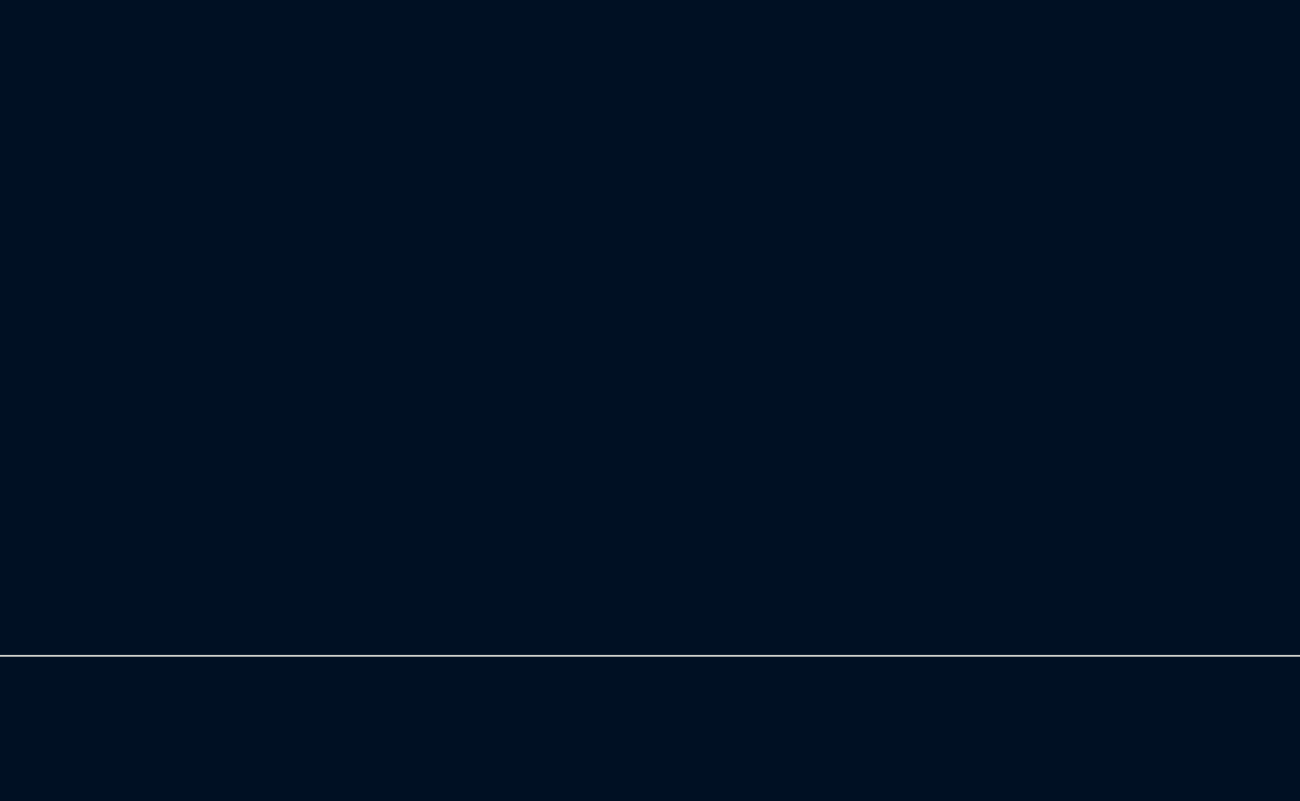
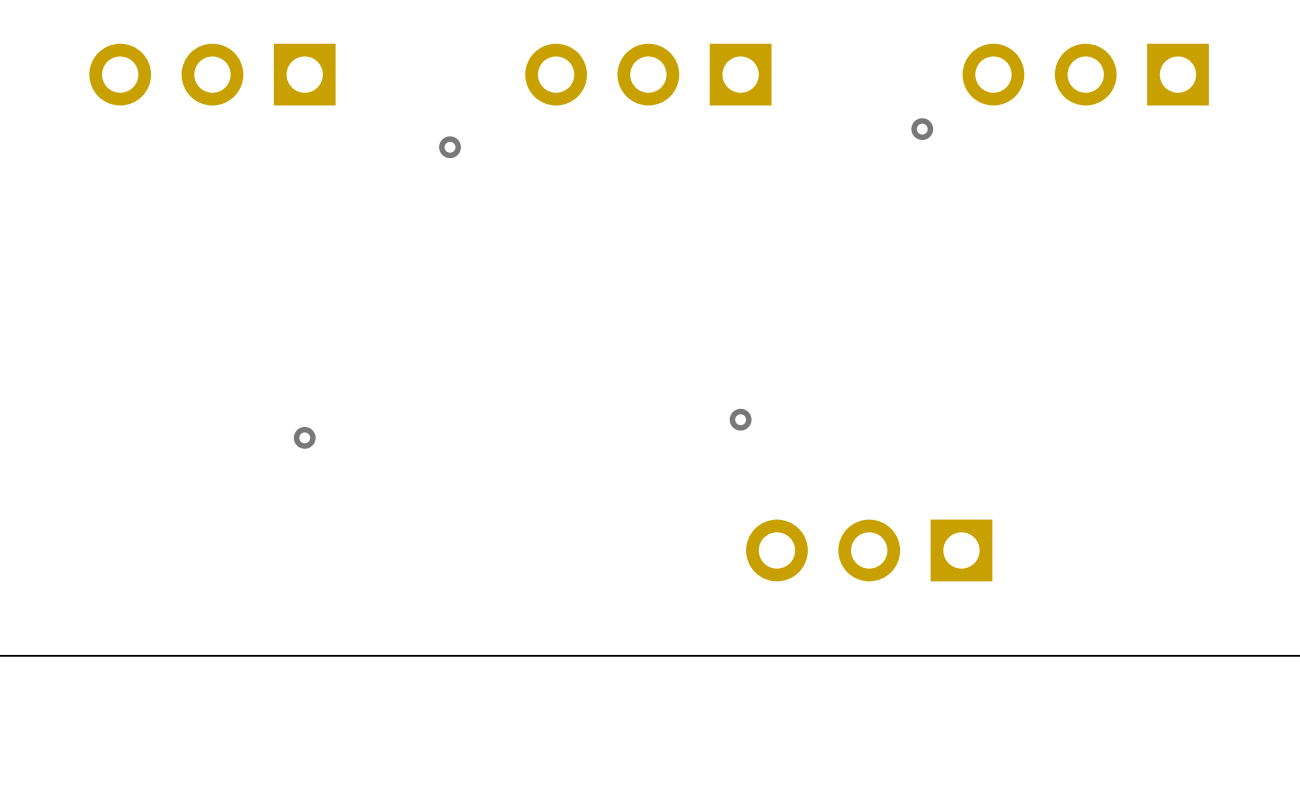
part: none -> (212, 74)
part: none -> (648, 74)
part: none -> (1085, 74)
via: none -> (922, 129)
via: none -> (450, 147)
via: none -> (740, 419)
via: none -> (304, 437)
part: none -> (869, 550)

